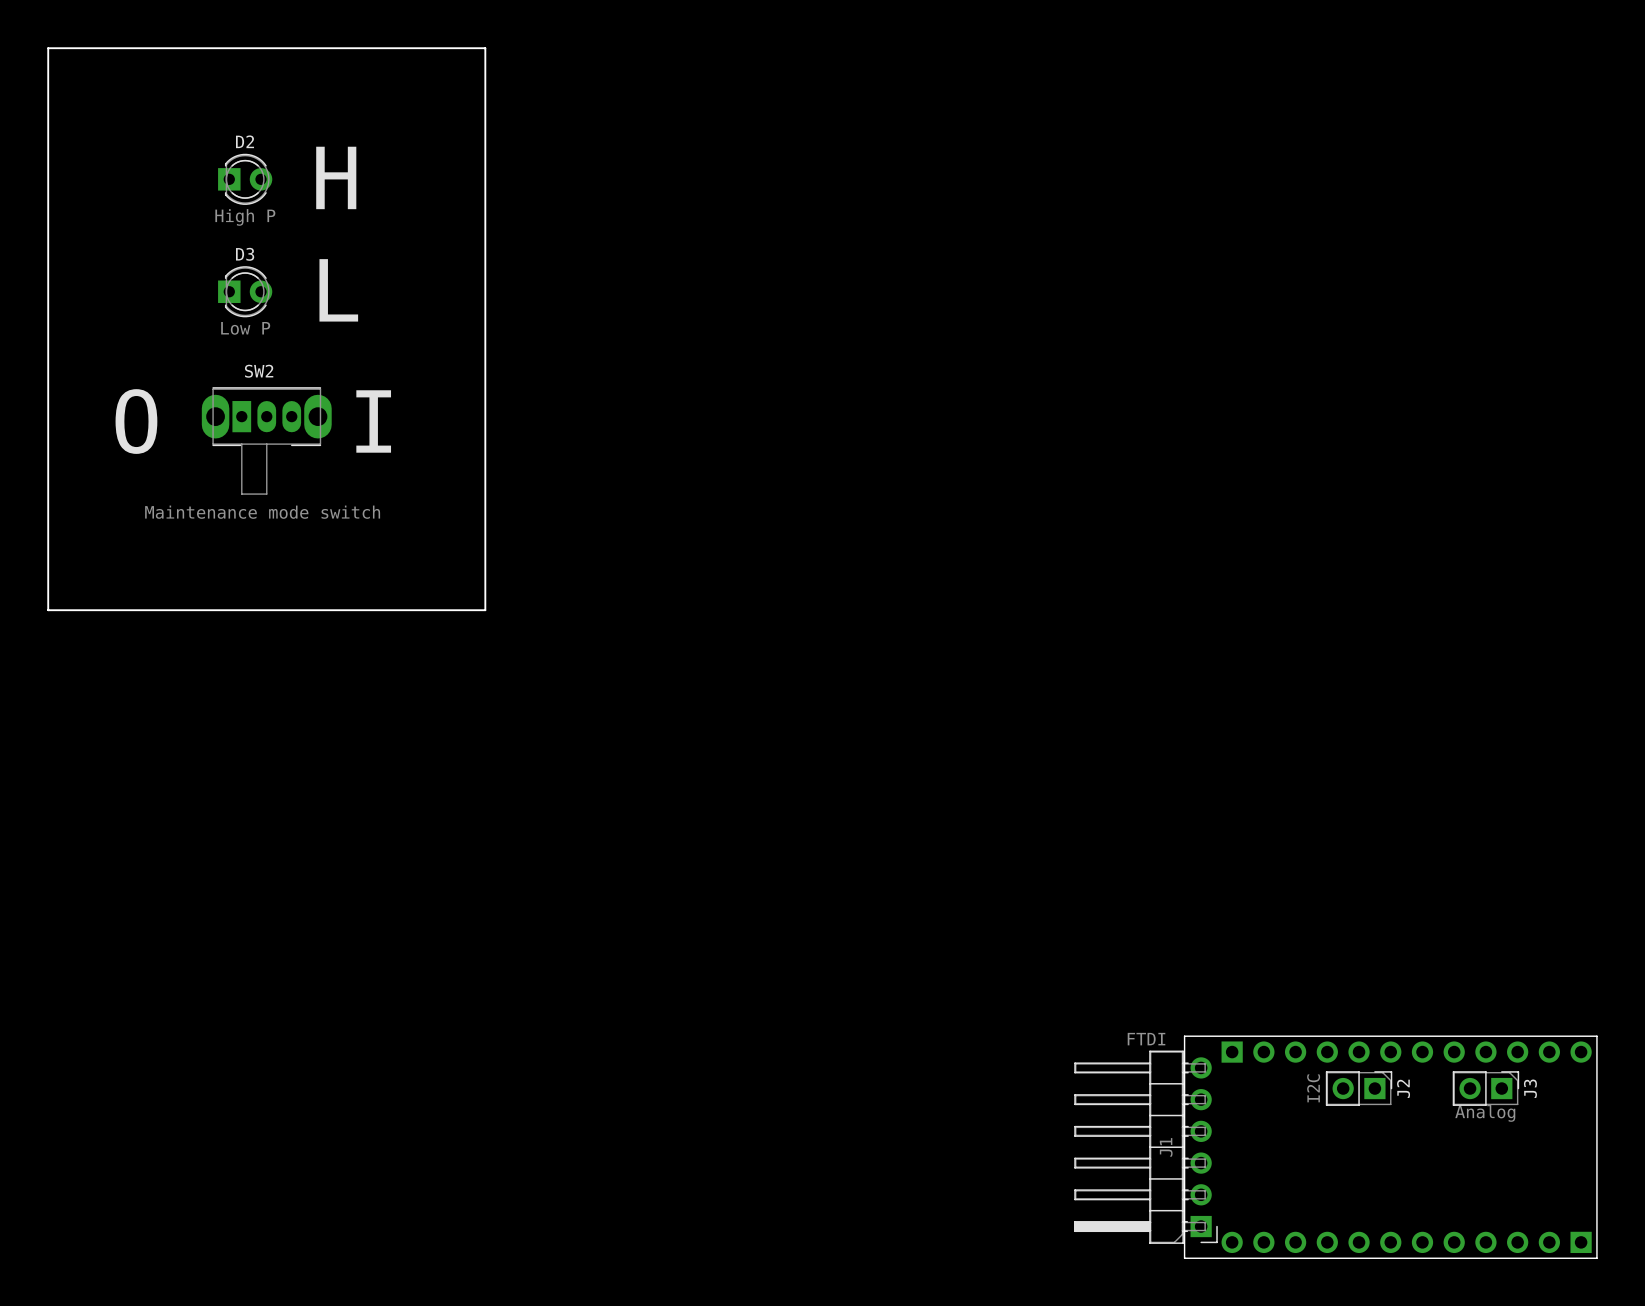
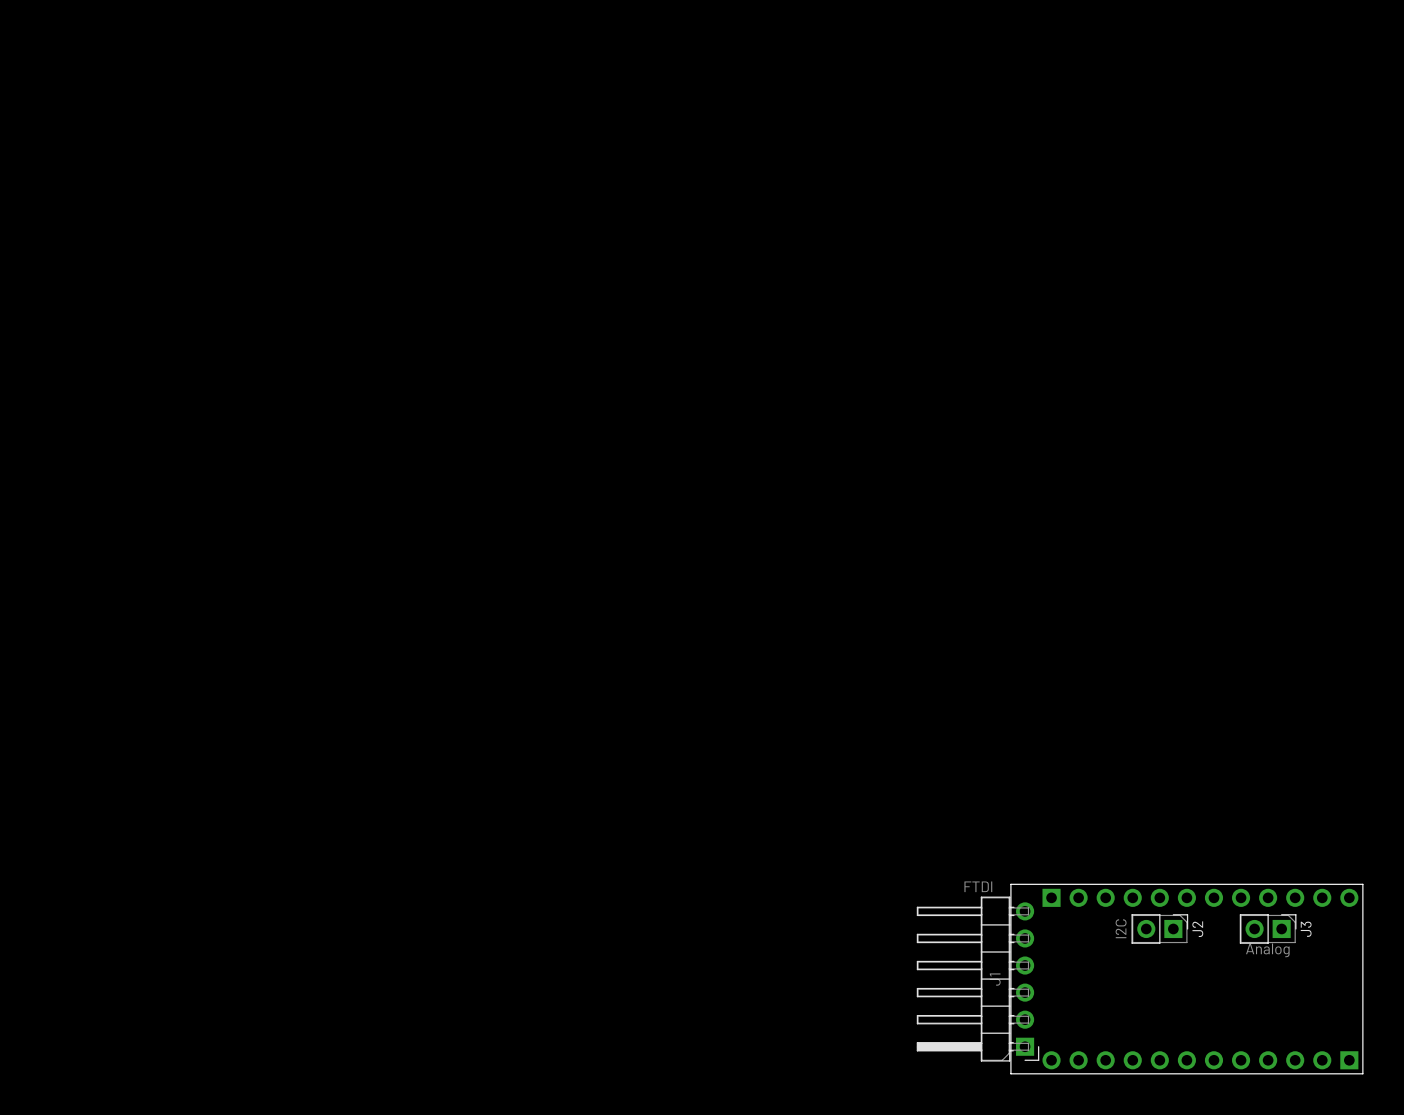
board edge: (48, 48) (485, 48) (485, 610) (48, 610) (48, 48) -> none
text: H (336, 177) -> none
D2: High P (245, 179) -> none
text: L (338, 290) -> none
D3: Low P (245, 291) -> none
text: O (136, 421) -> none
text: I (373, 421) -> none
SW2: Maintenance mode switch (266, 440) -> none

